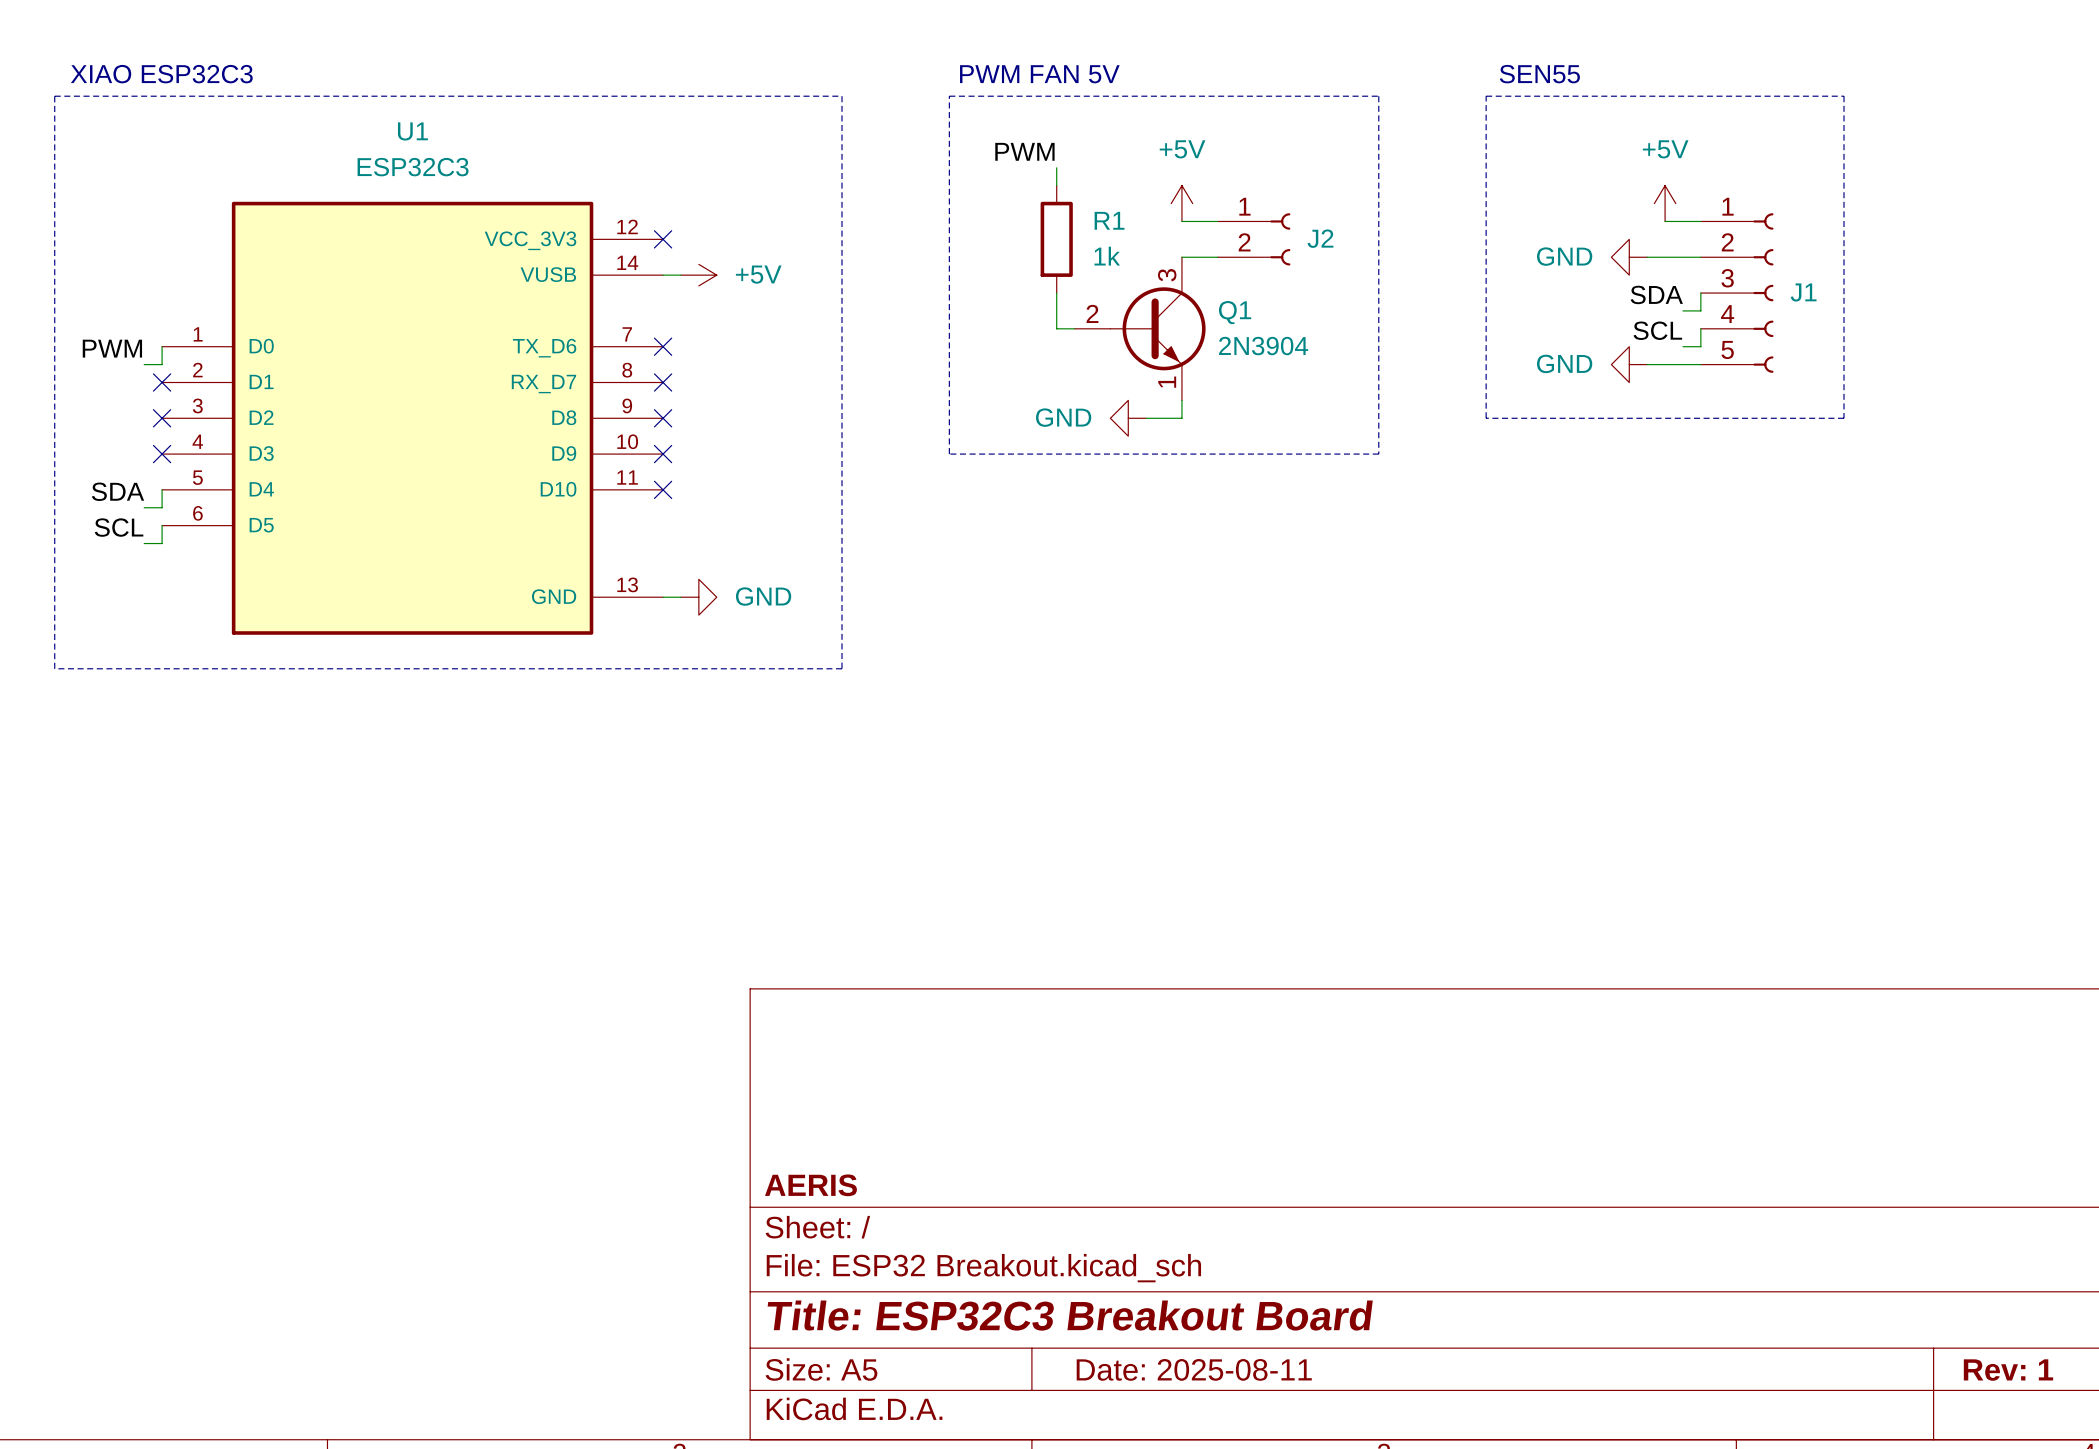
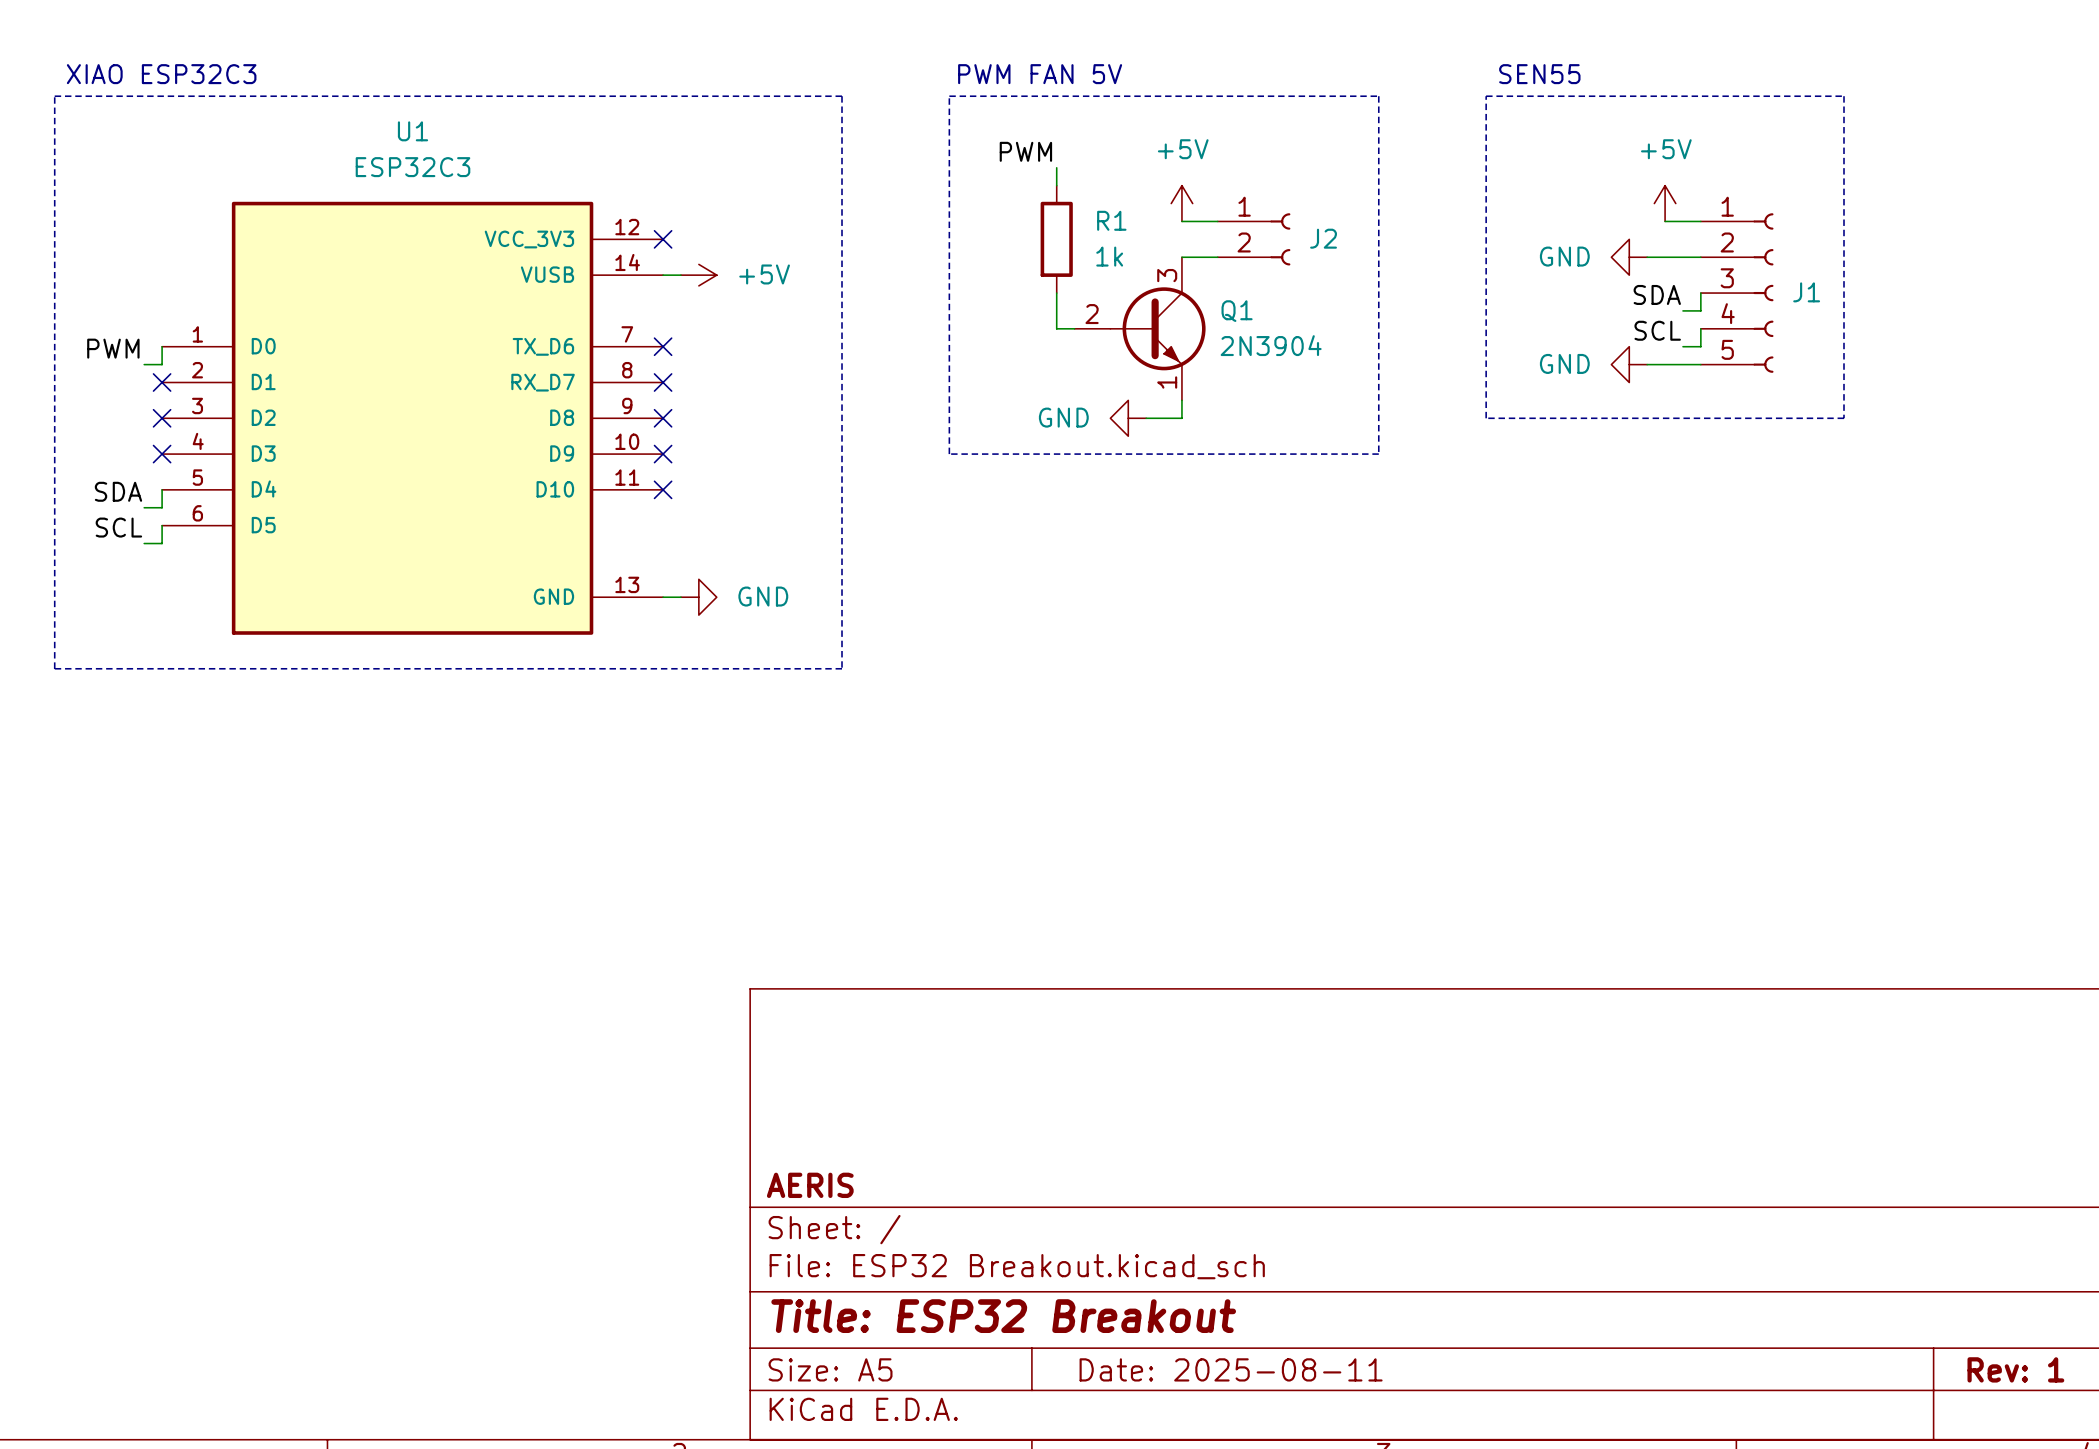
title block: Title: ESP32C3 Breakout Board (1070, 1315) -> Title: ESP32 Breakout (1003, 1316)

